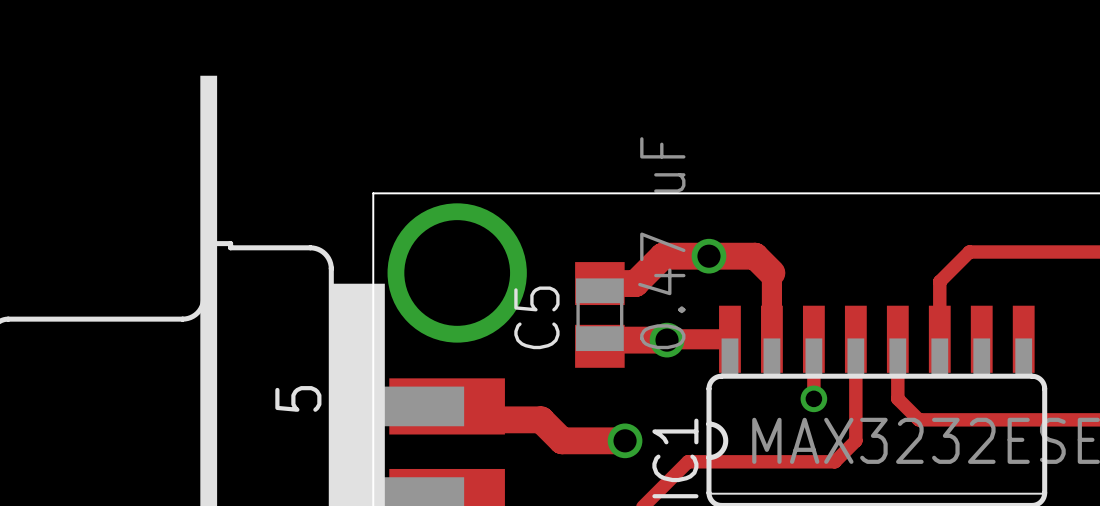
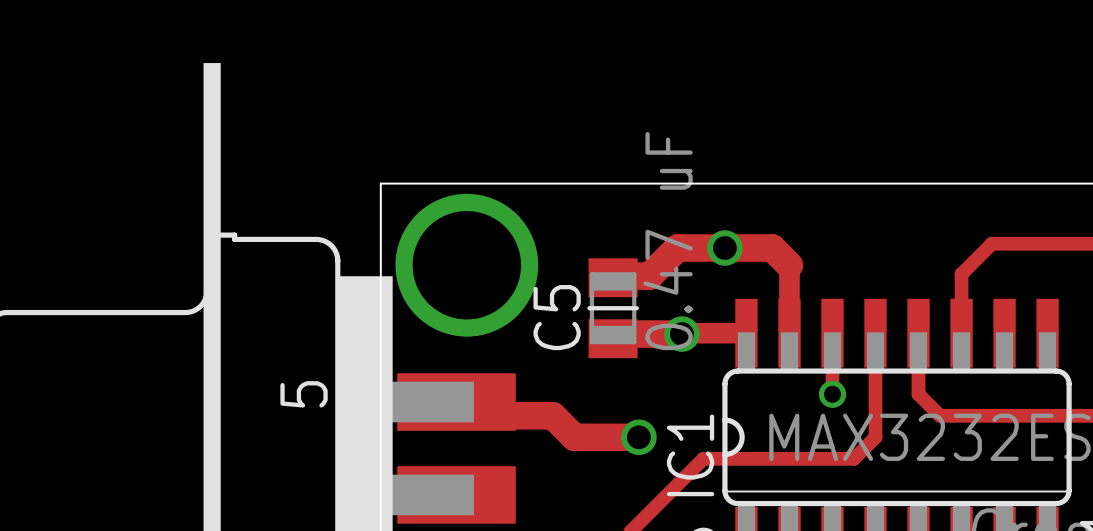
C5 footprint: [575, 262, 625, 368] -> [587, 258, 639, 359]

